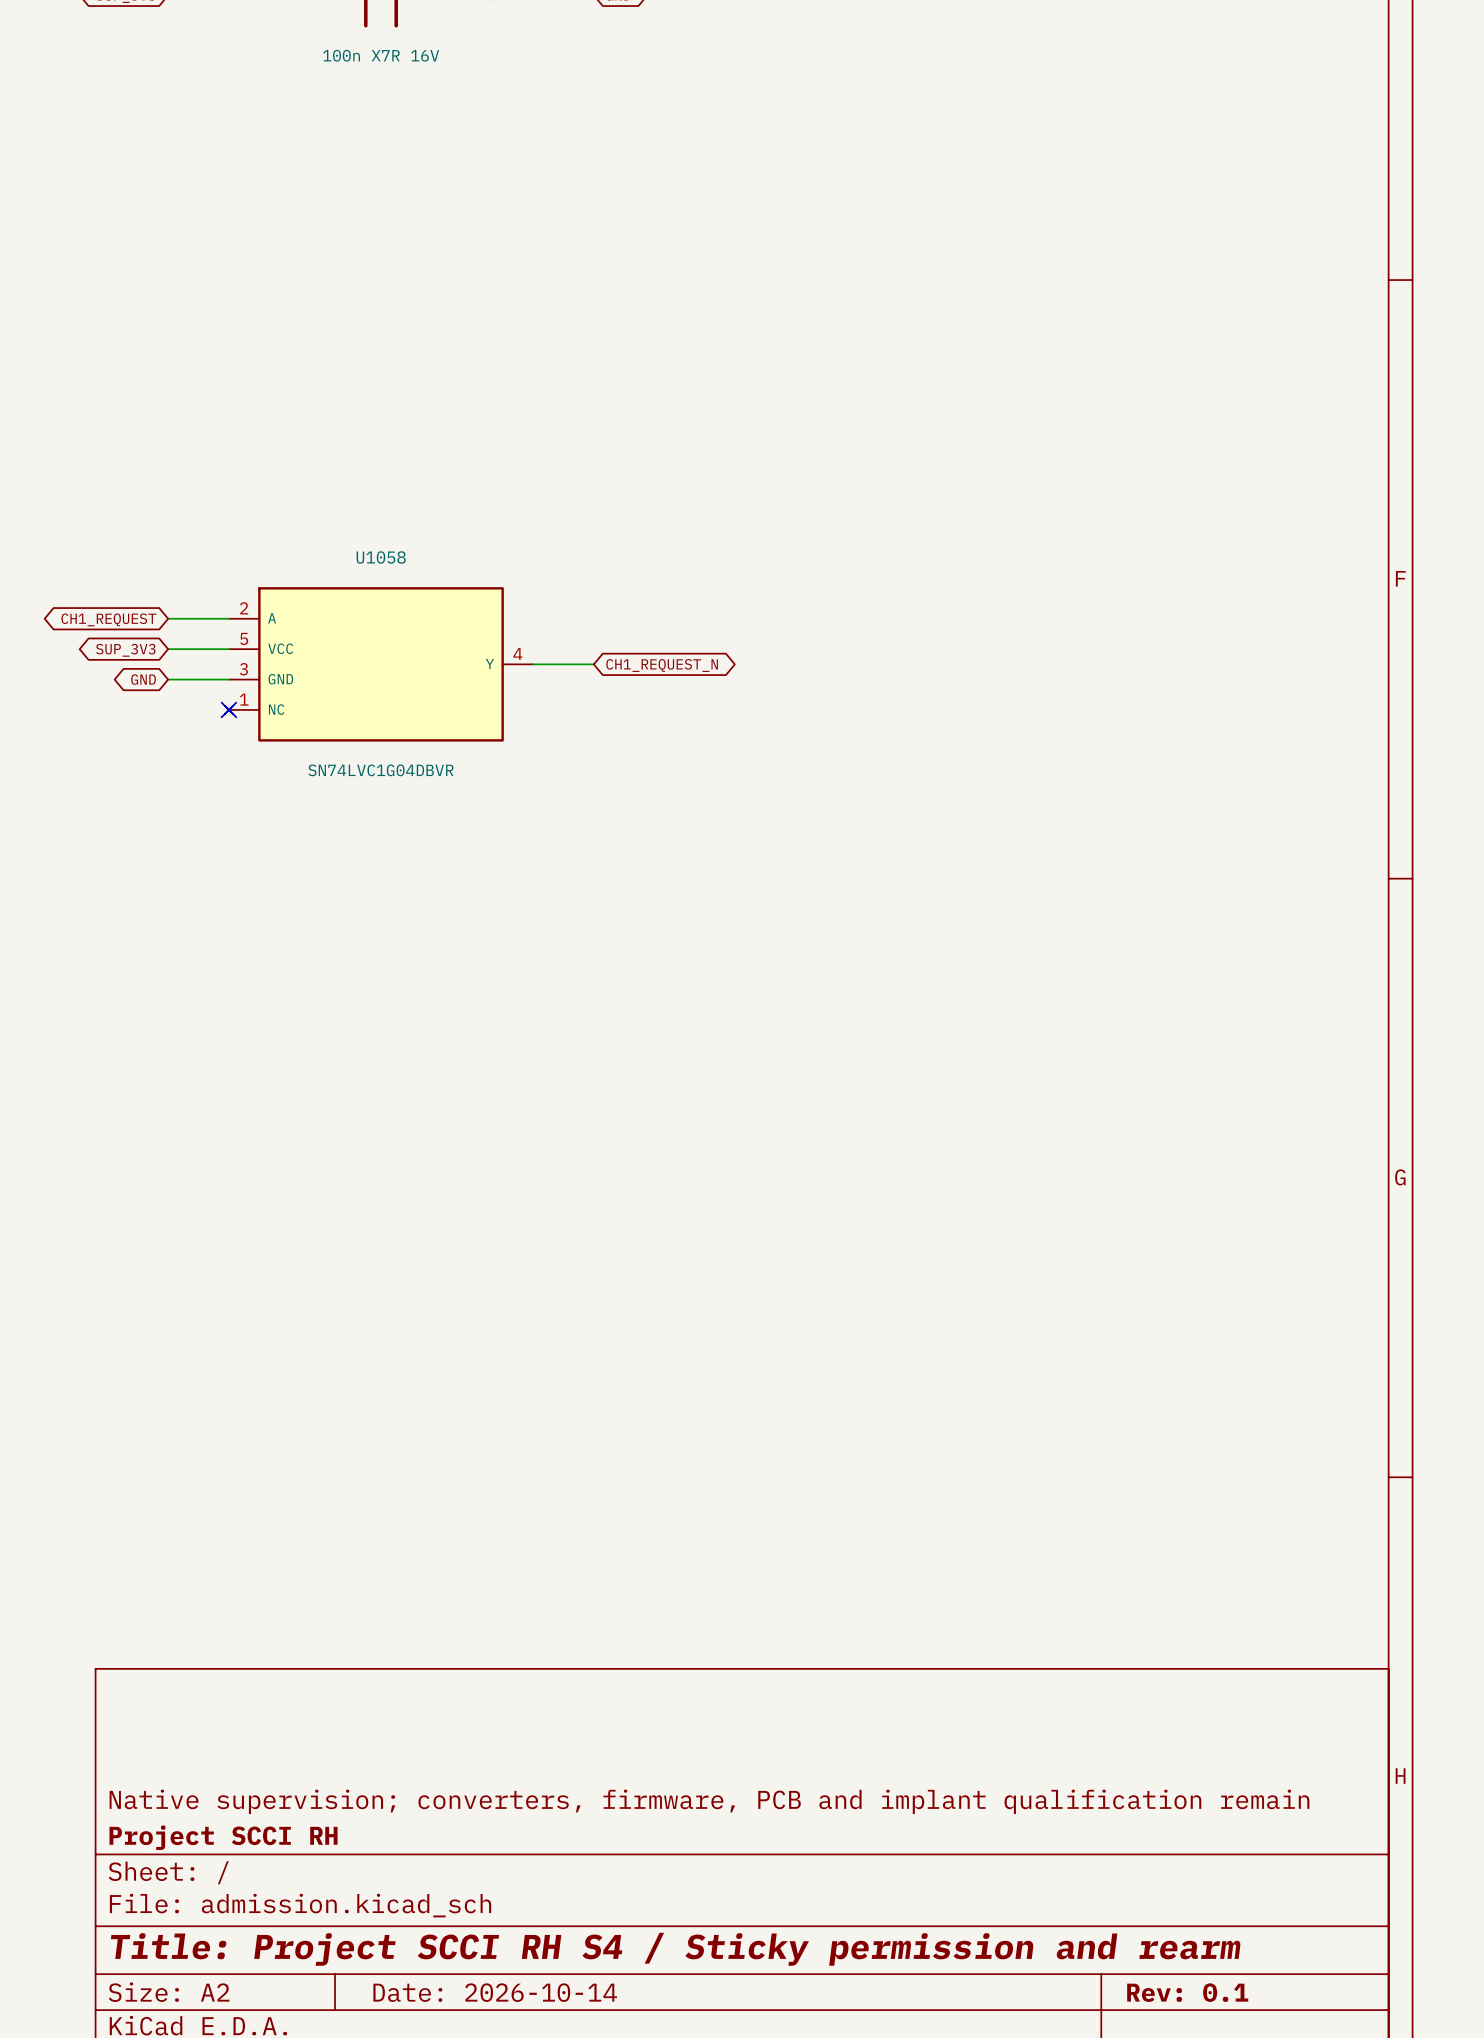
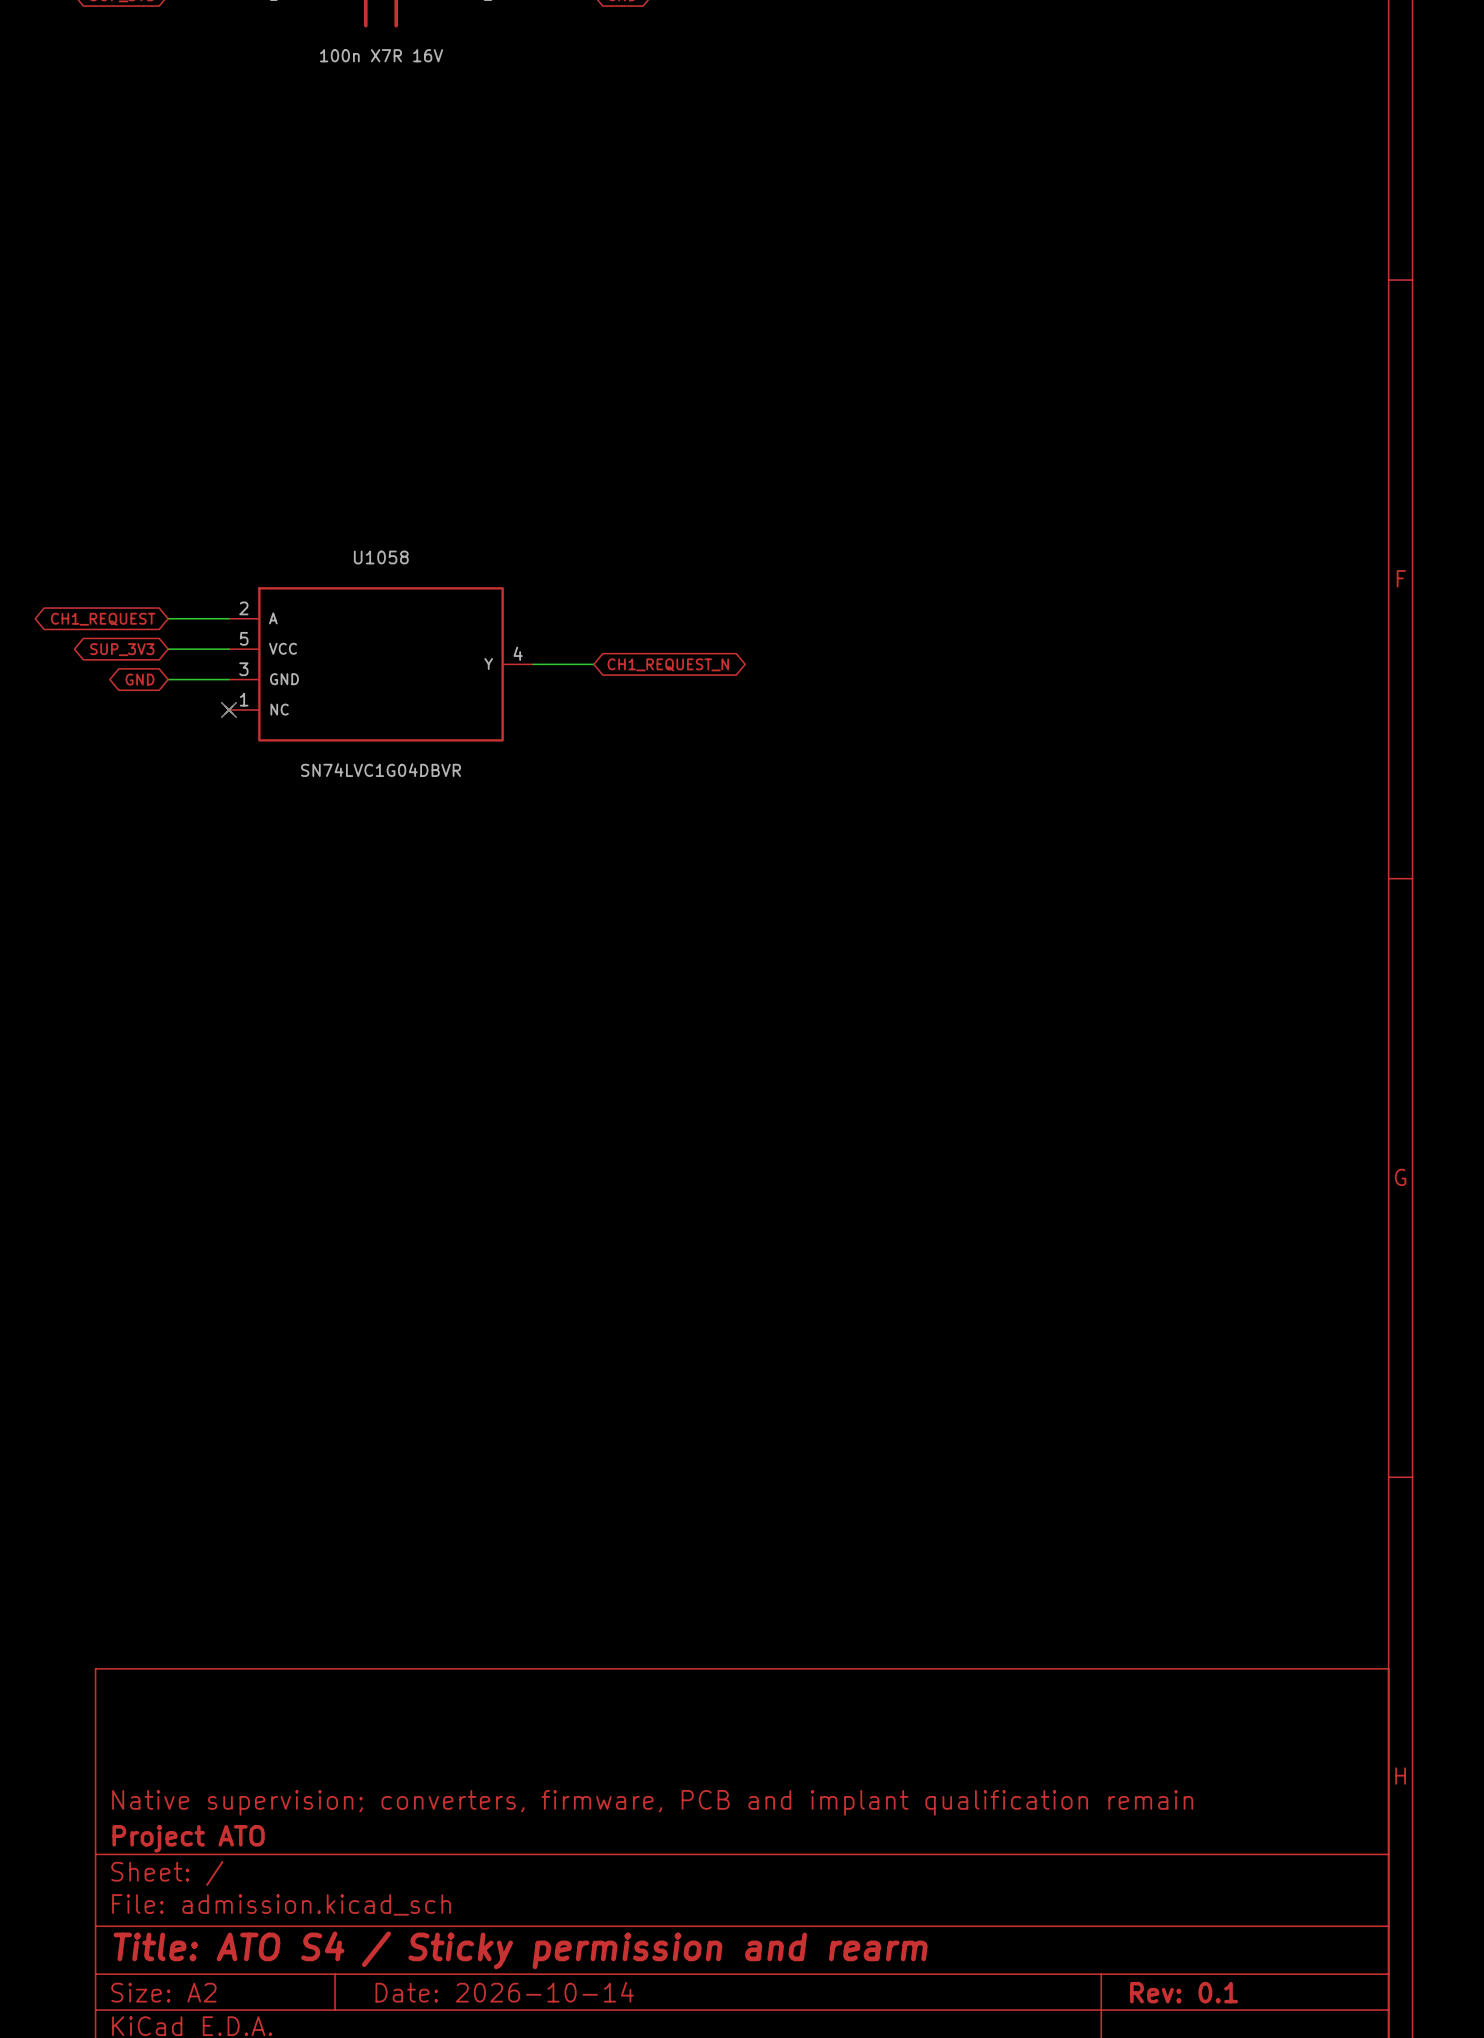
title block: Project SCCI RH (223, 1837) -> Project ATO (188, 1838)
title block: Title: Project SCCI RH S4 / Sticky permission and rearm (675, 1949) -> Title: ATO S4 / Sticky permission and rearm (520, 1950)

